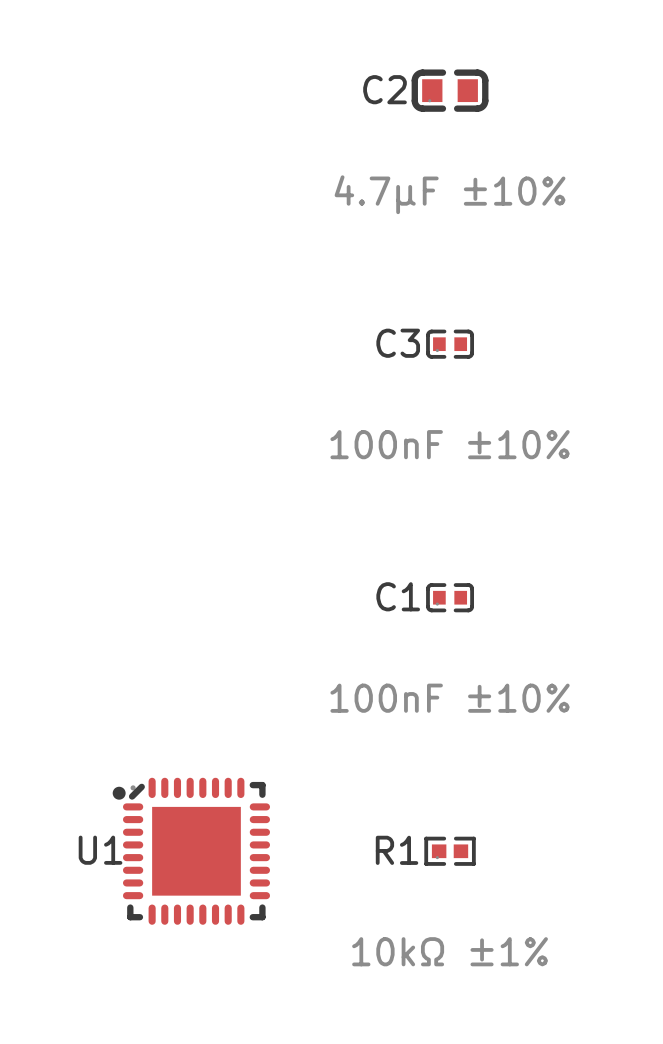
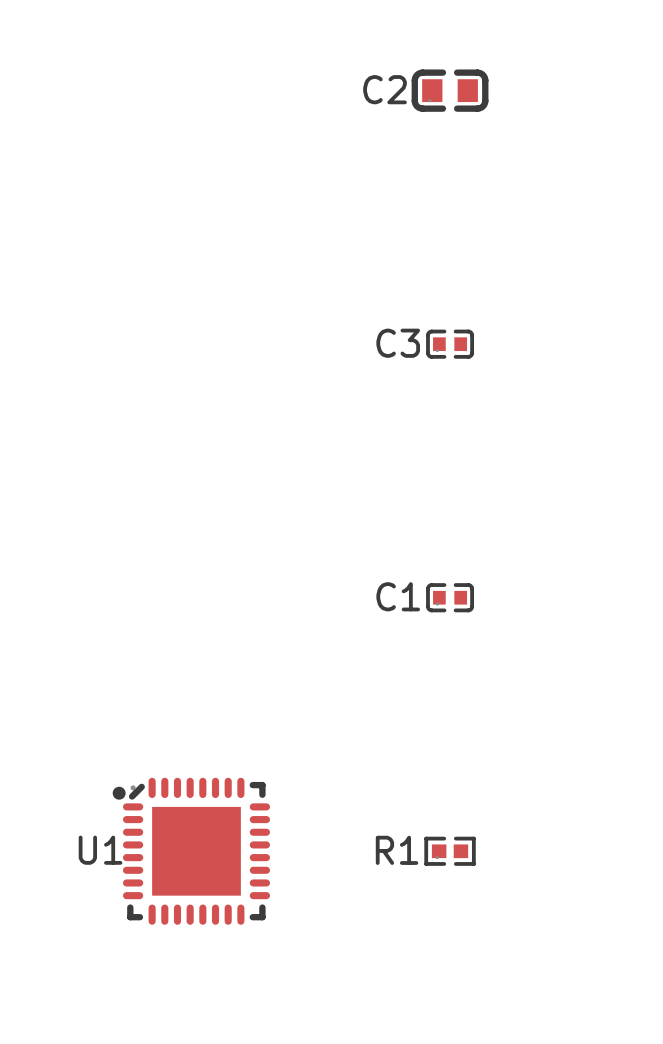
C2 value: 4.7µF ±10% (450, 194) -> none
C3 value: 100nF ±10% (450, 444) -> none
C1 value: 100nF ±10% (450, 698) -> none
R1 value: 10kΩ ±1% (450, 951) -> none

